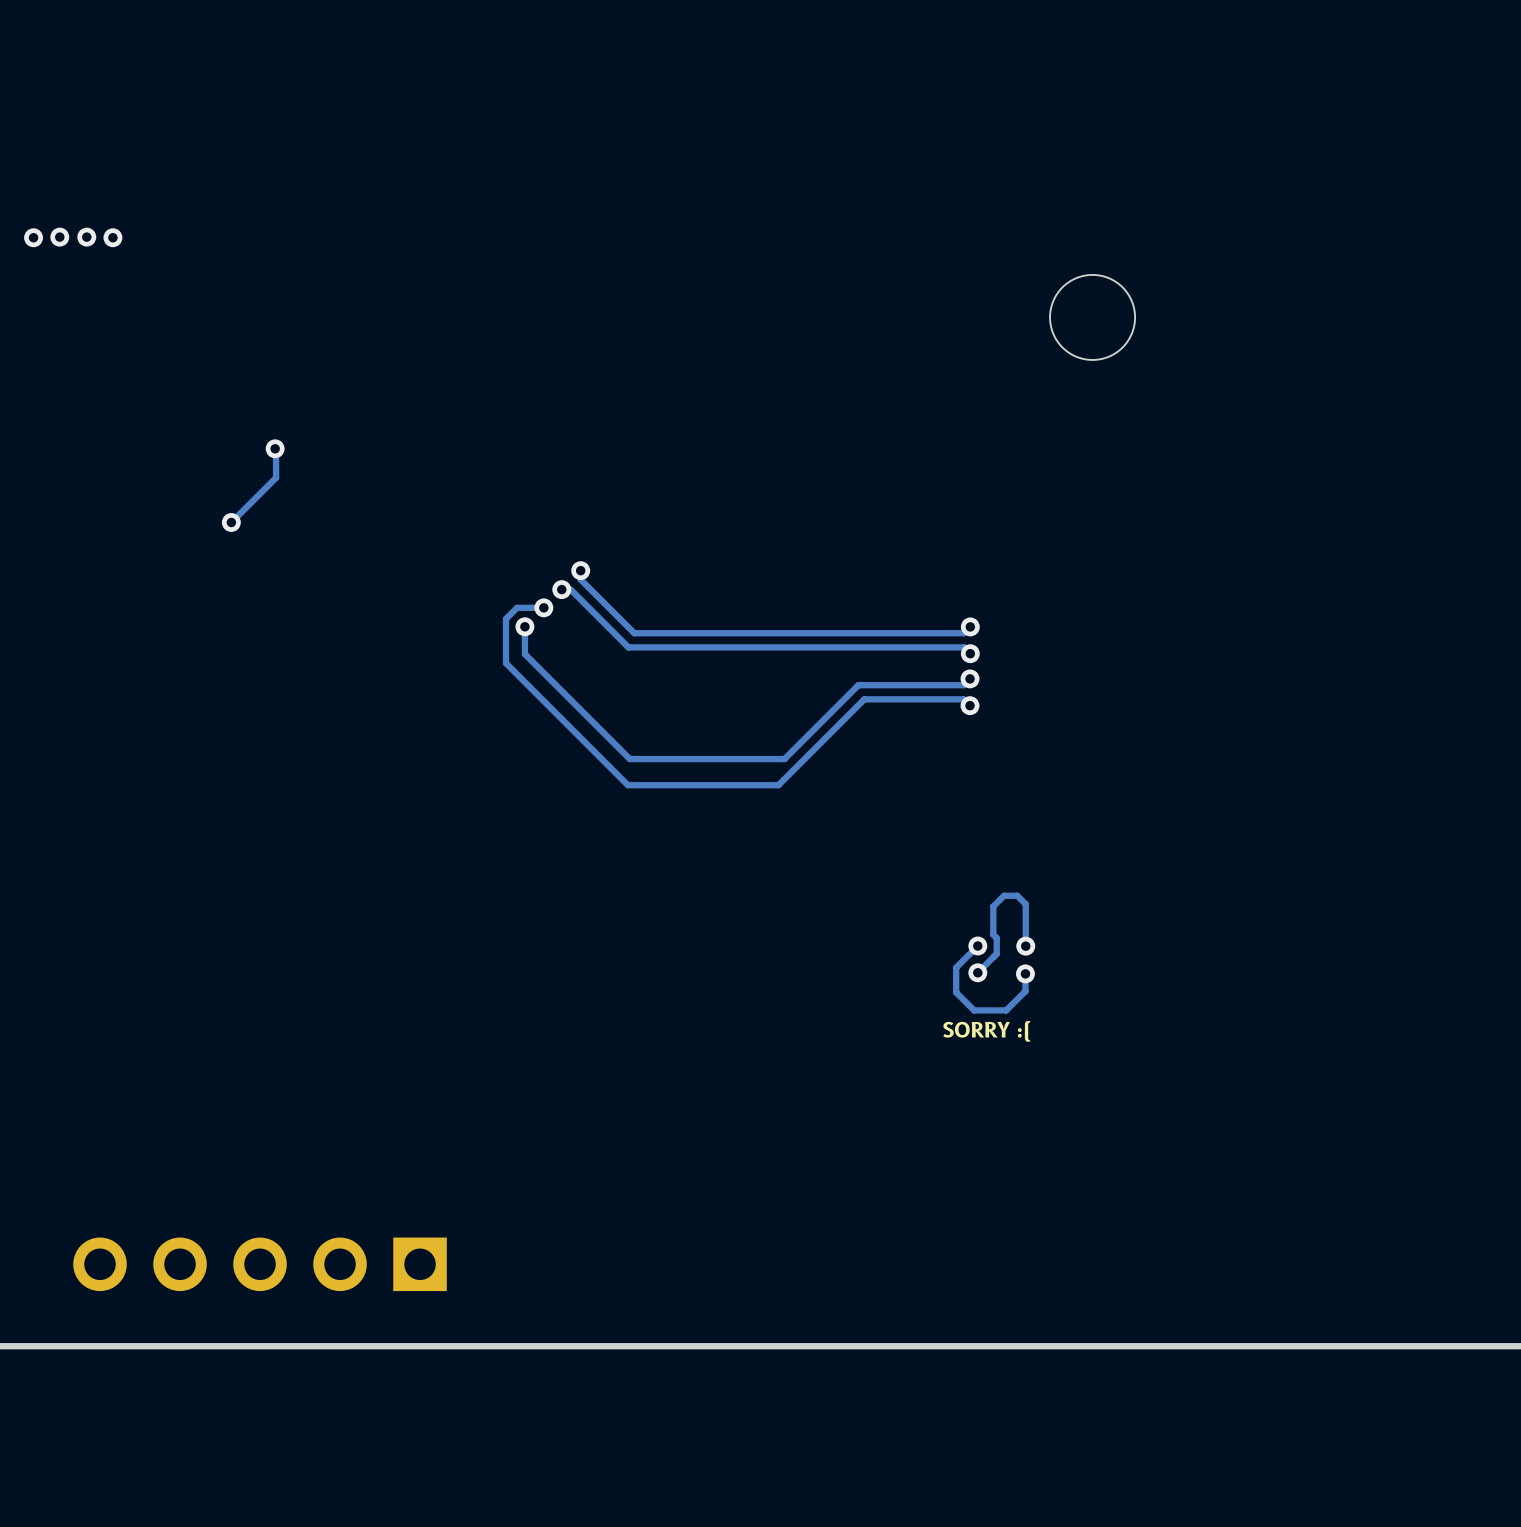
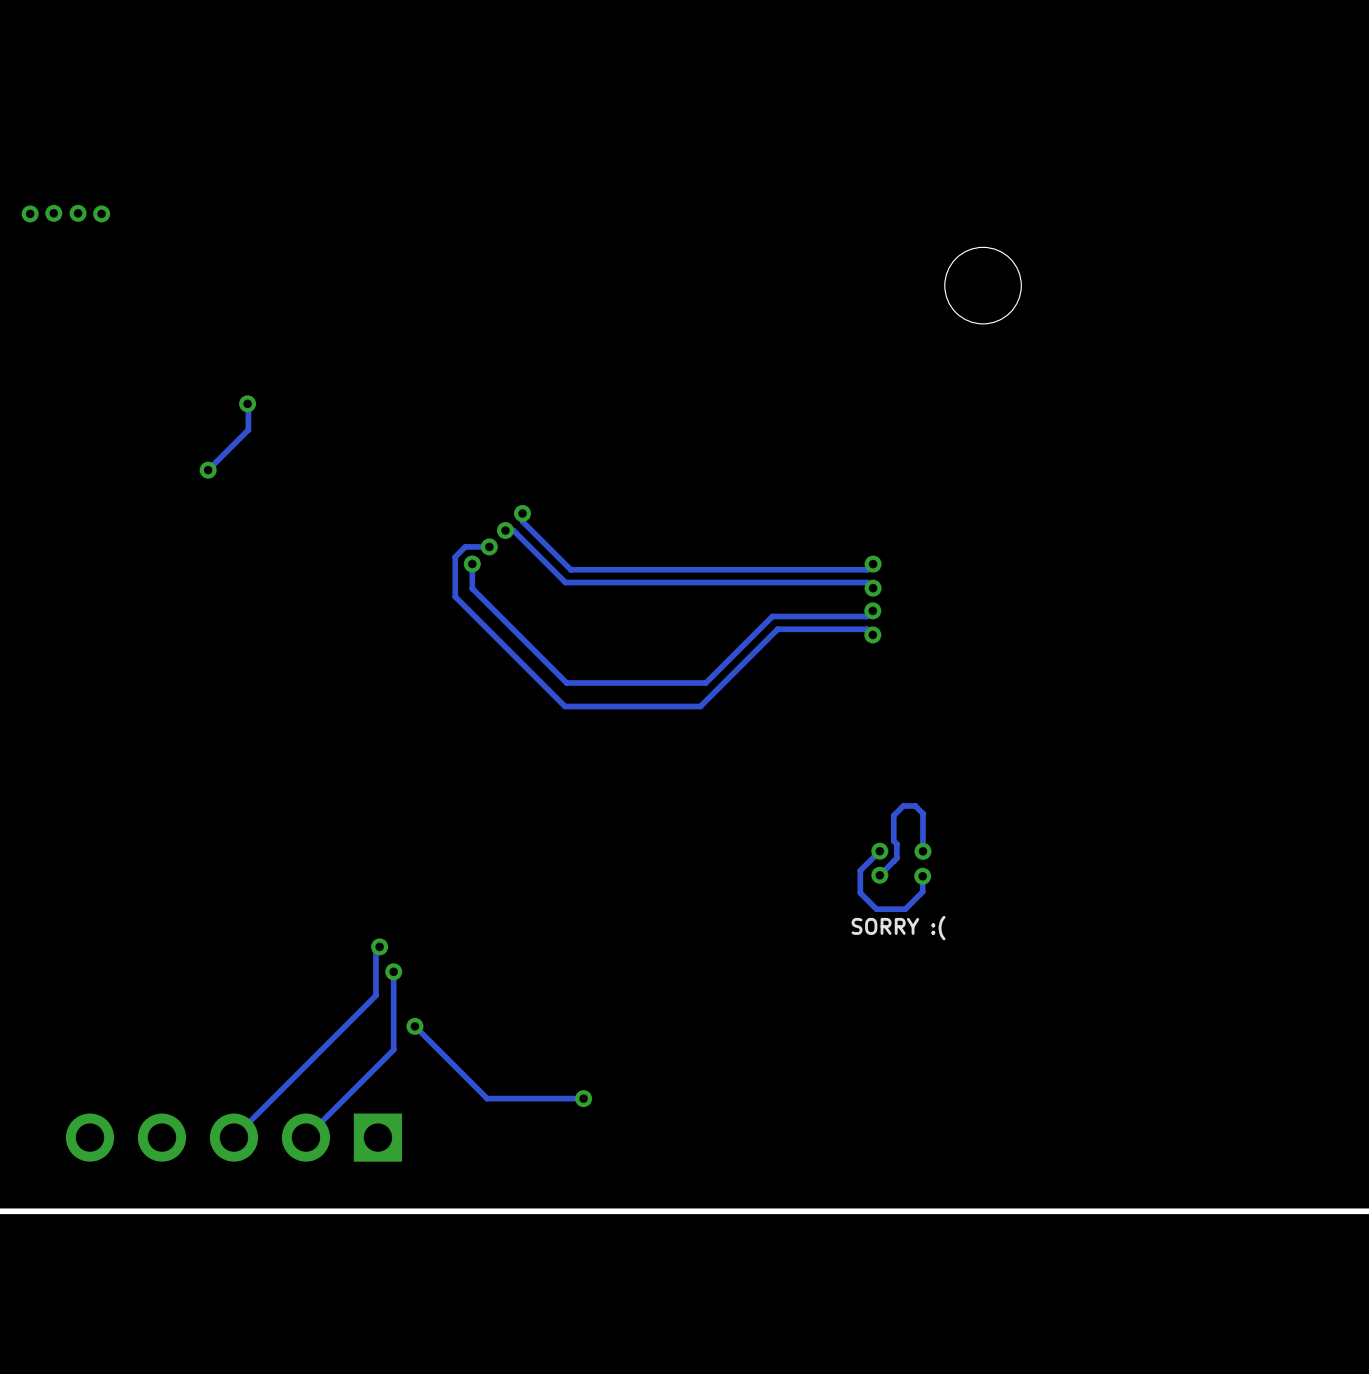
track: none -> (379, 946) (375, 950) (375, 995) (233, 1137)
via: none -> (379, 946)
track: none -> (393, 971) (393, 1049) (305, 1137)
via: none -> (393, 971)
track: none -> (414, 1026) (487, 1098) (583, 1098)
via: none -> (414, 1026)
via: none -> (583, 1098)

